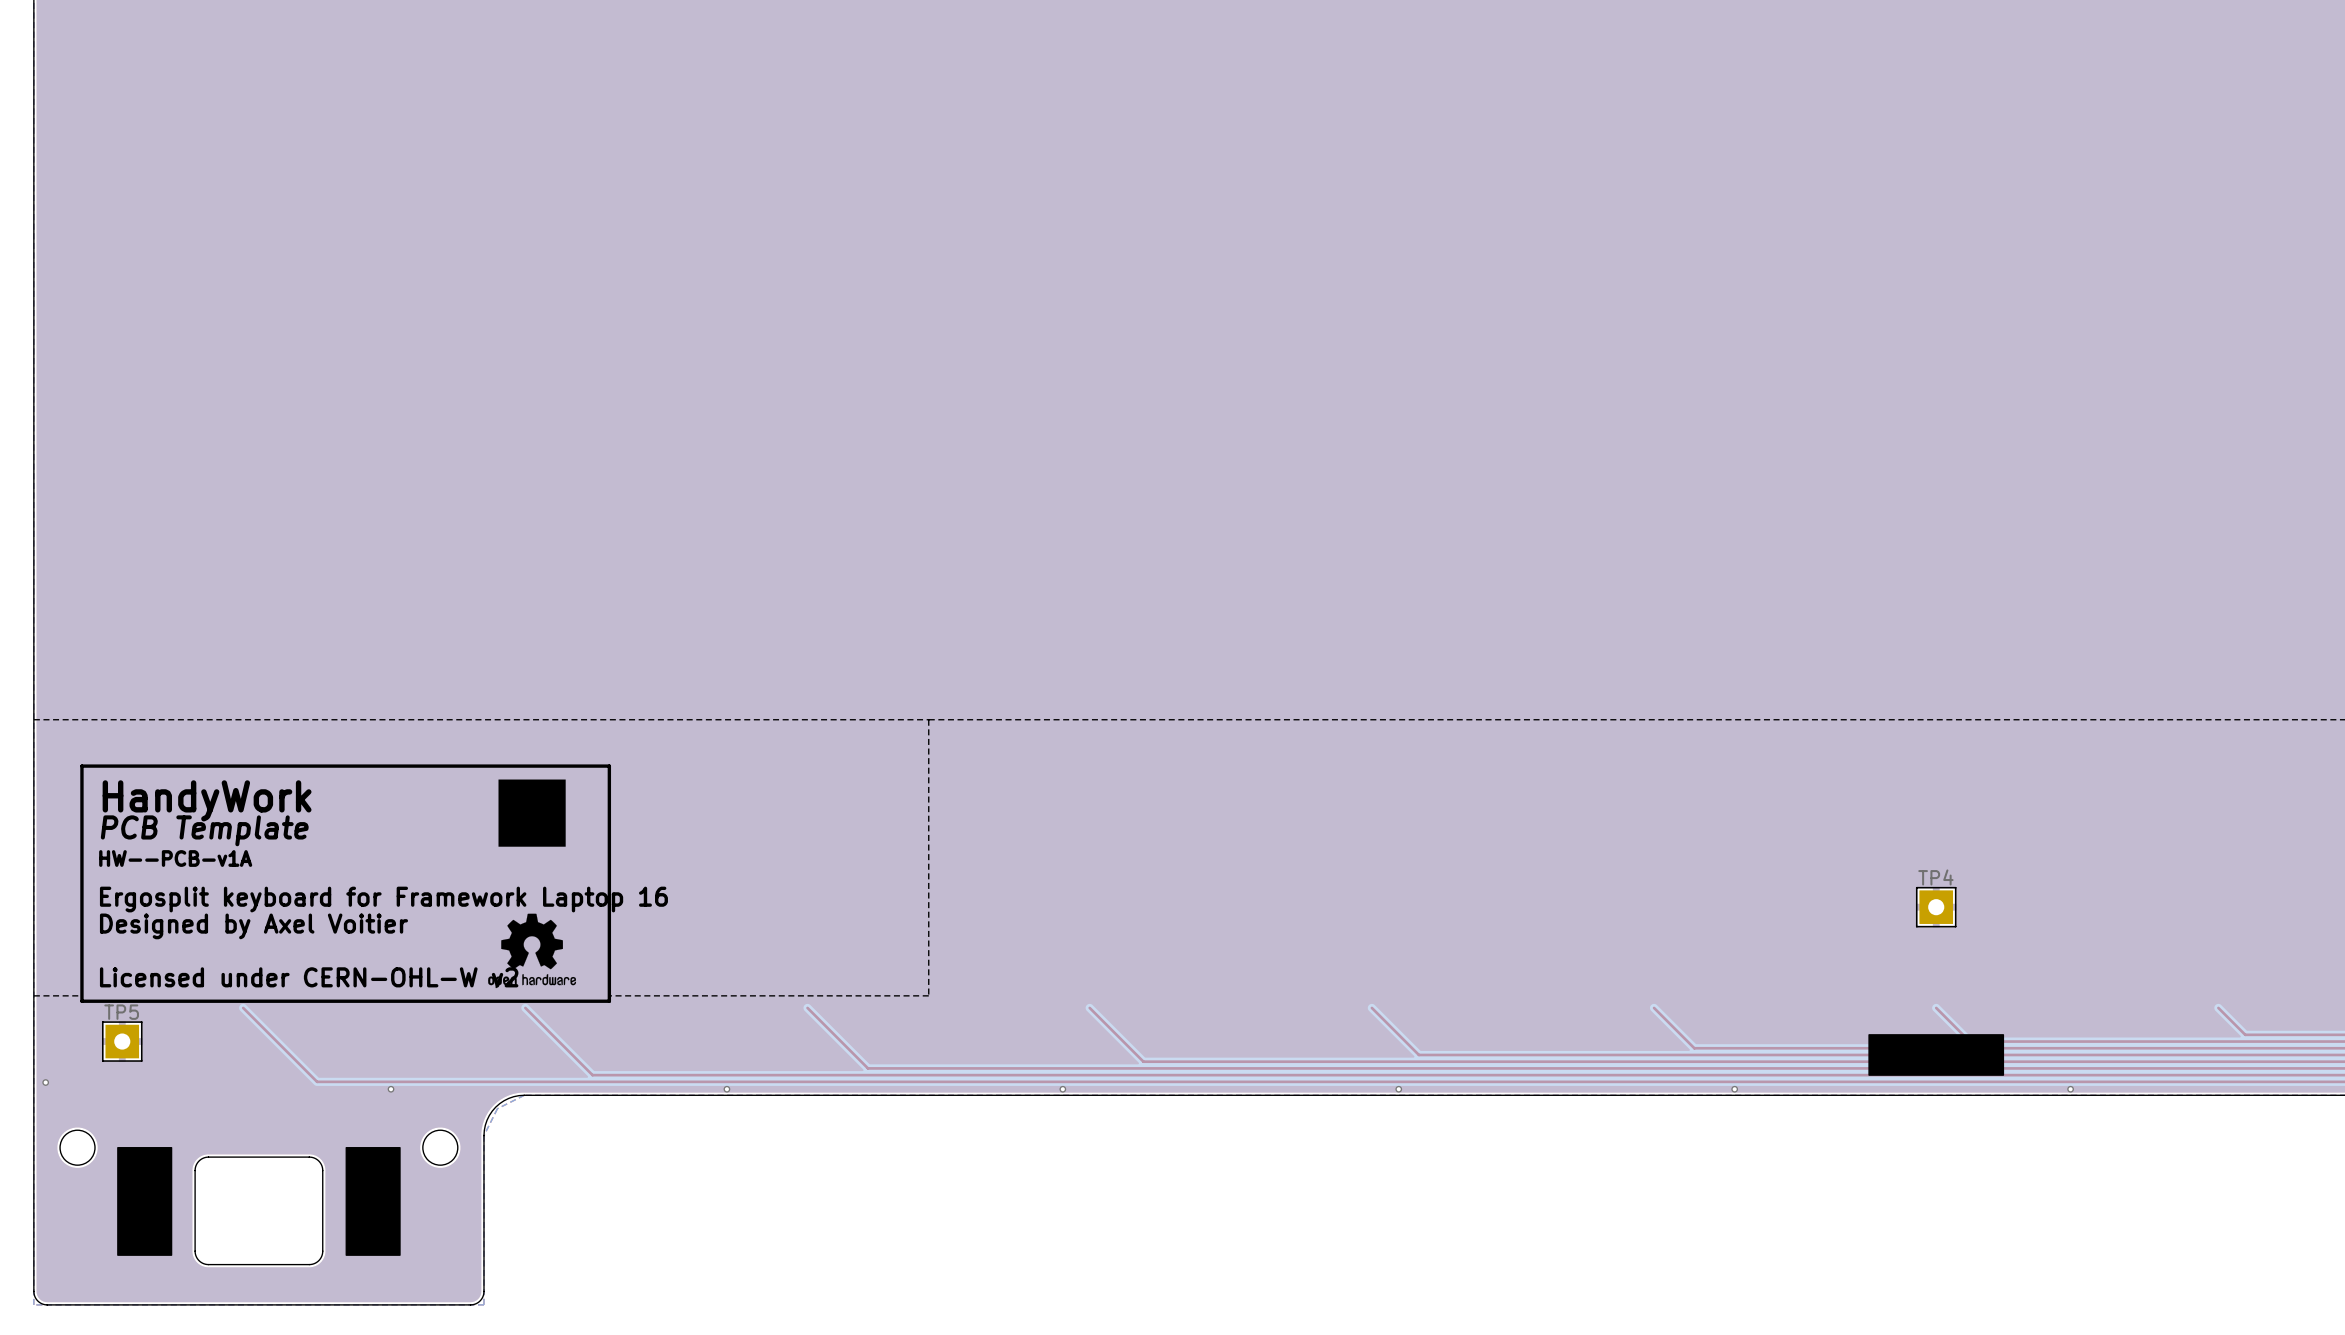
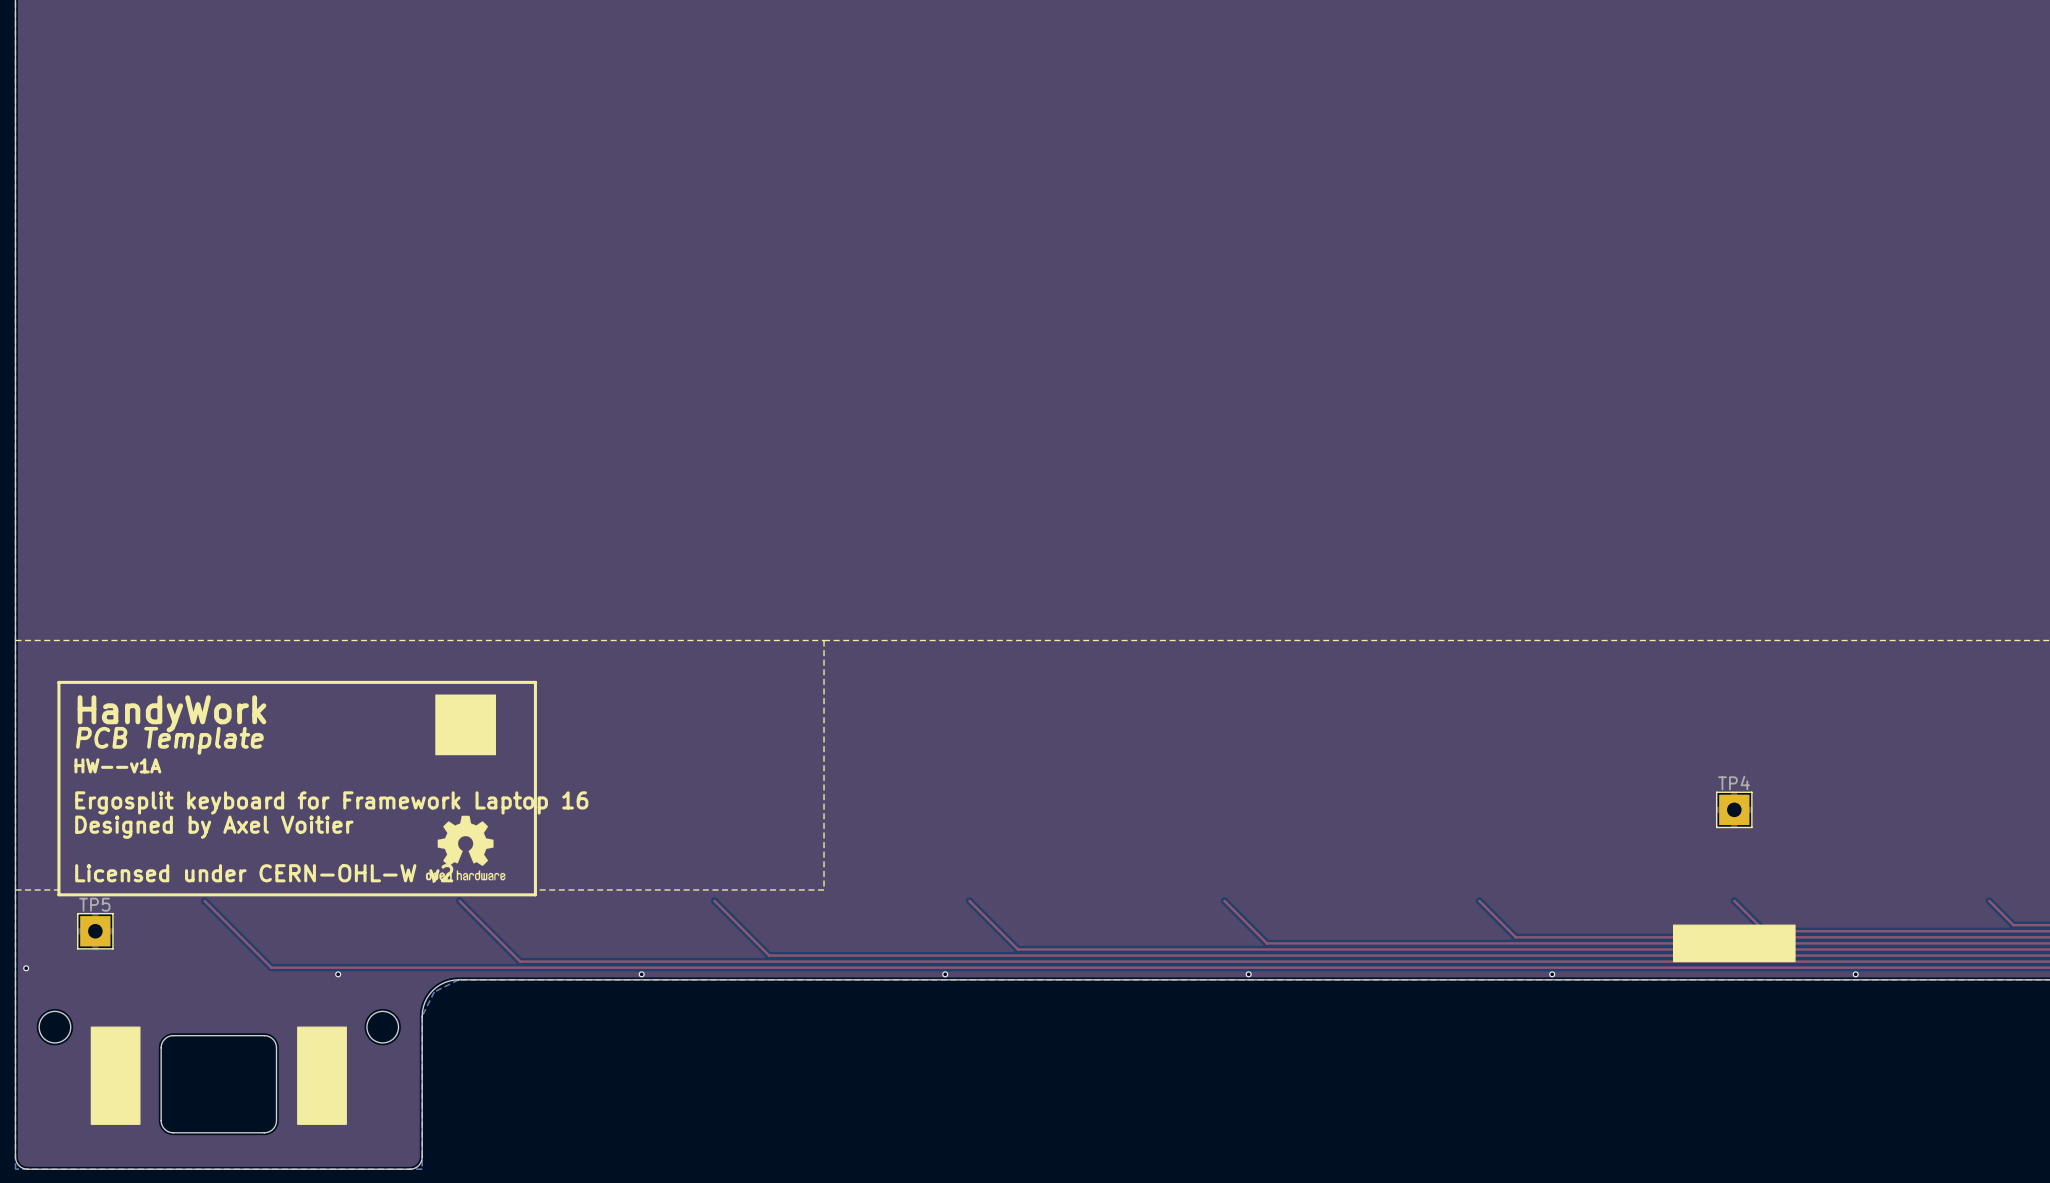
text: HW--PCB-v1A (175, 858) -> HW--v1A (117, 765)

